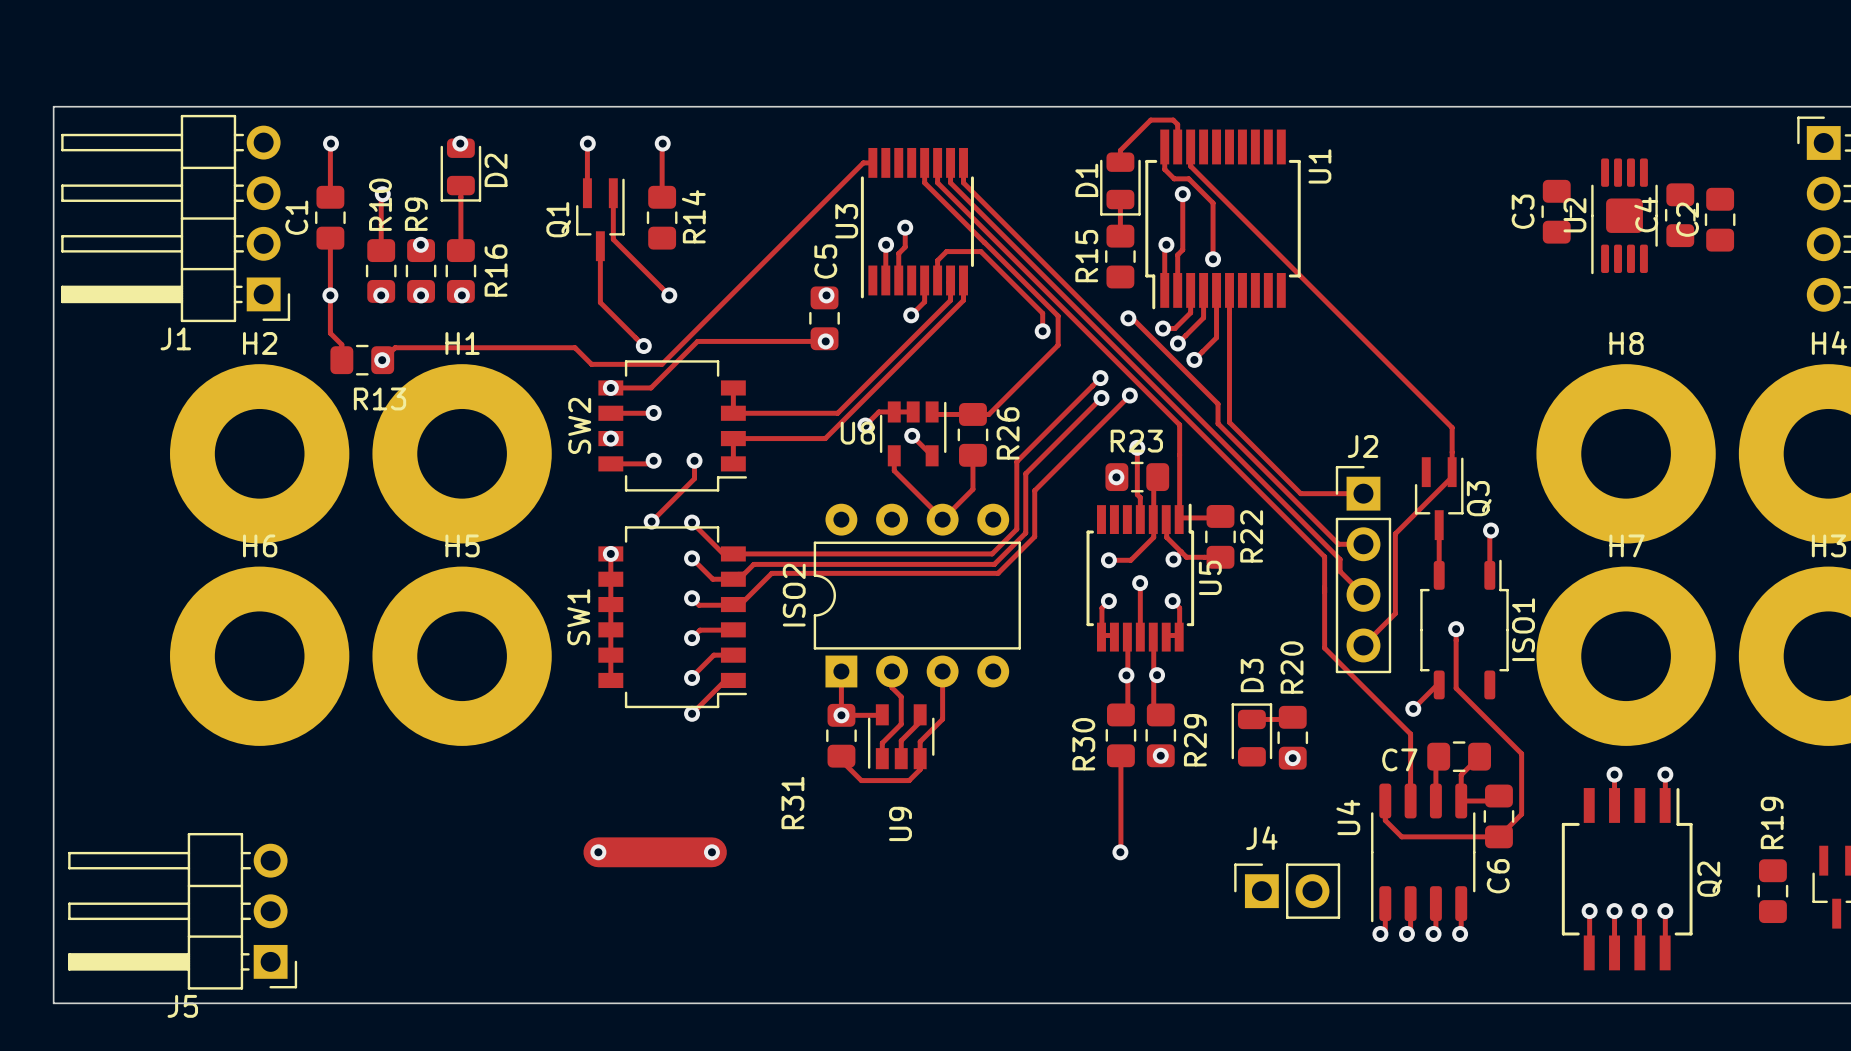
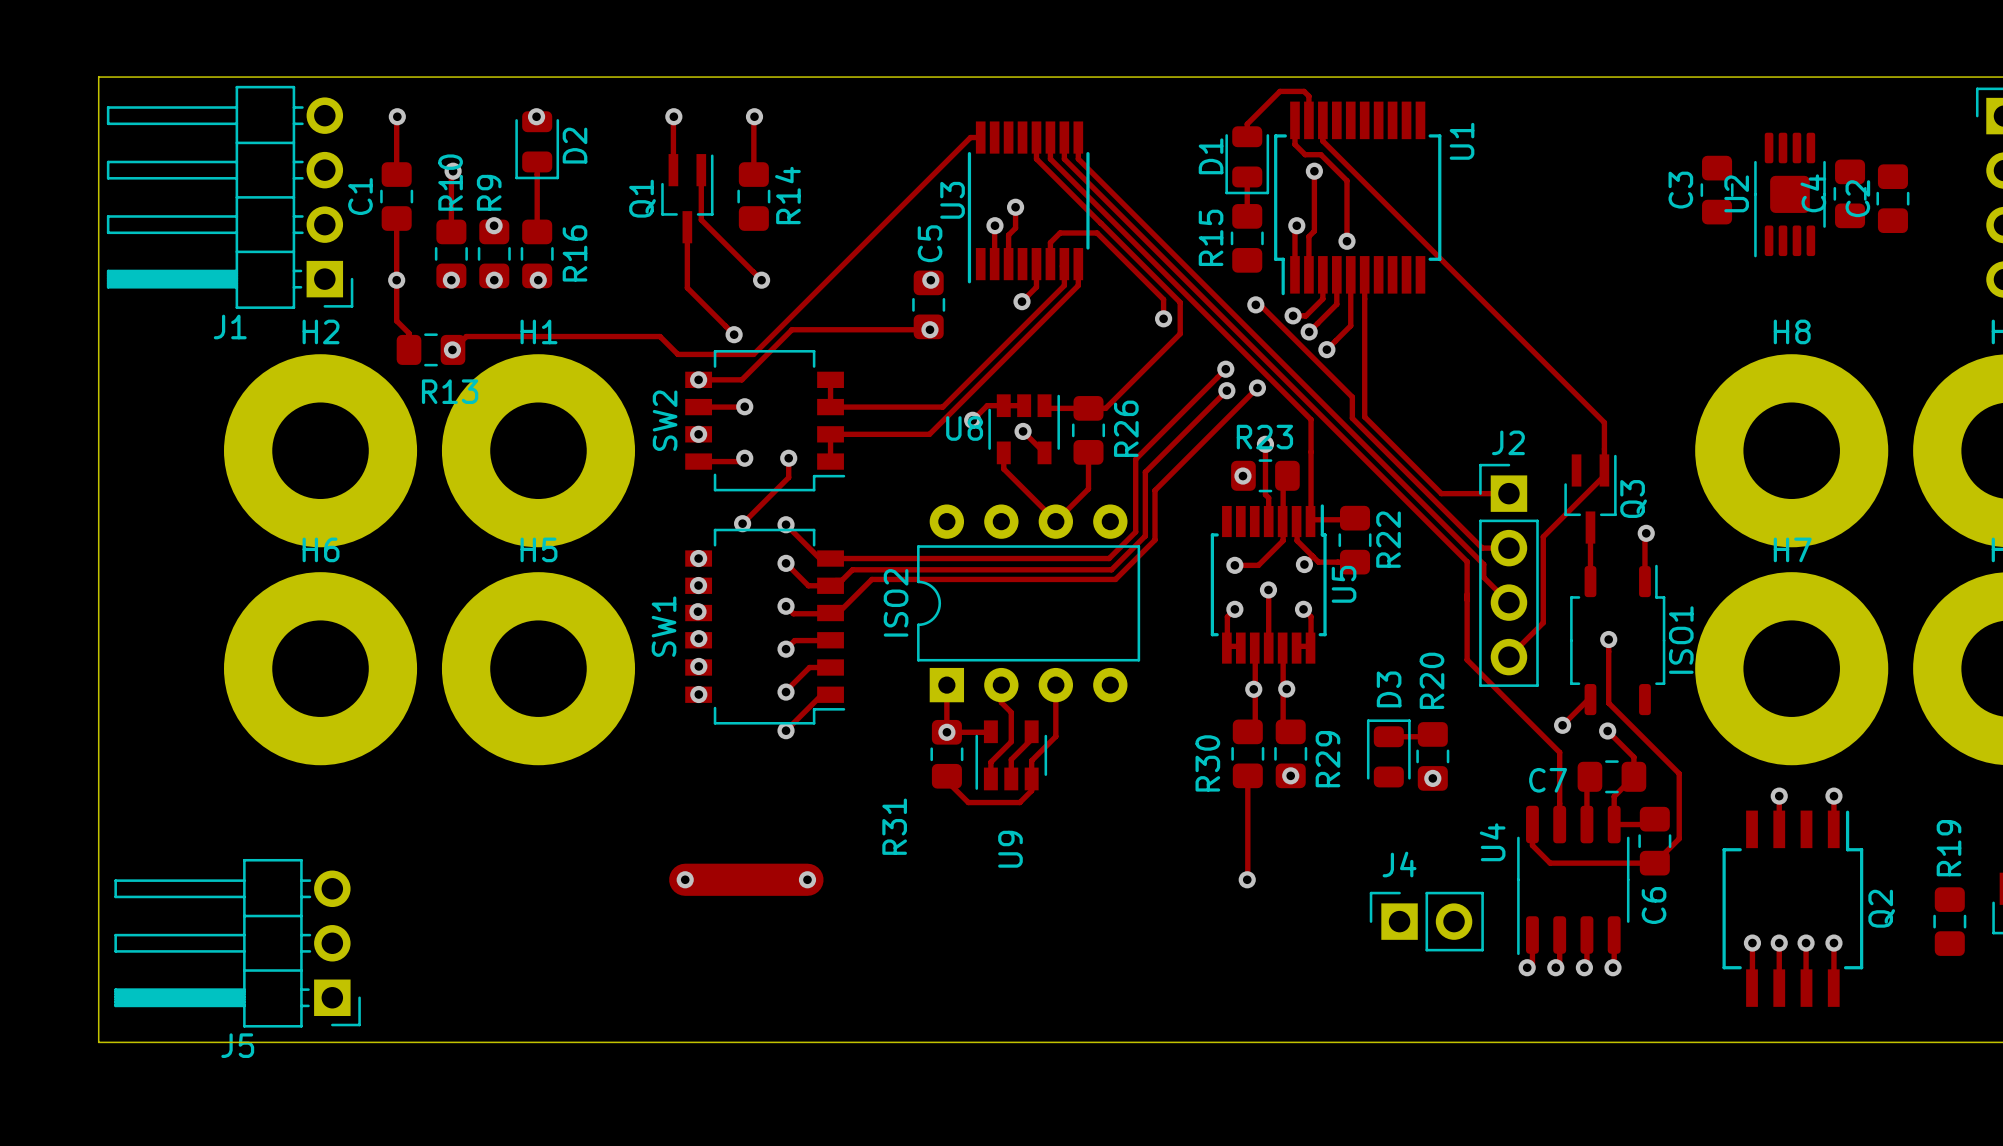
track: (610, 553) (610, 680) -> none
via: none -> (698, 585)
via: none -> (697, 611)
via: none -> (698, 638)
via: none -> (698, 666)
via: none -> (698, 694)
track: none -> (1607, 731) (1633, 757) (1633, 776)
via: none -> (1607, 731)

